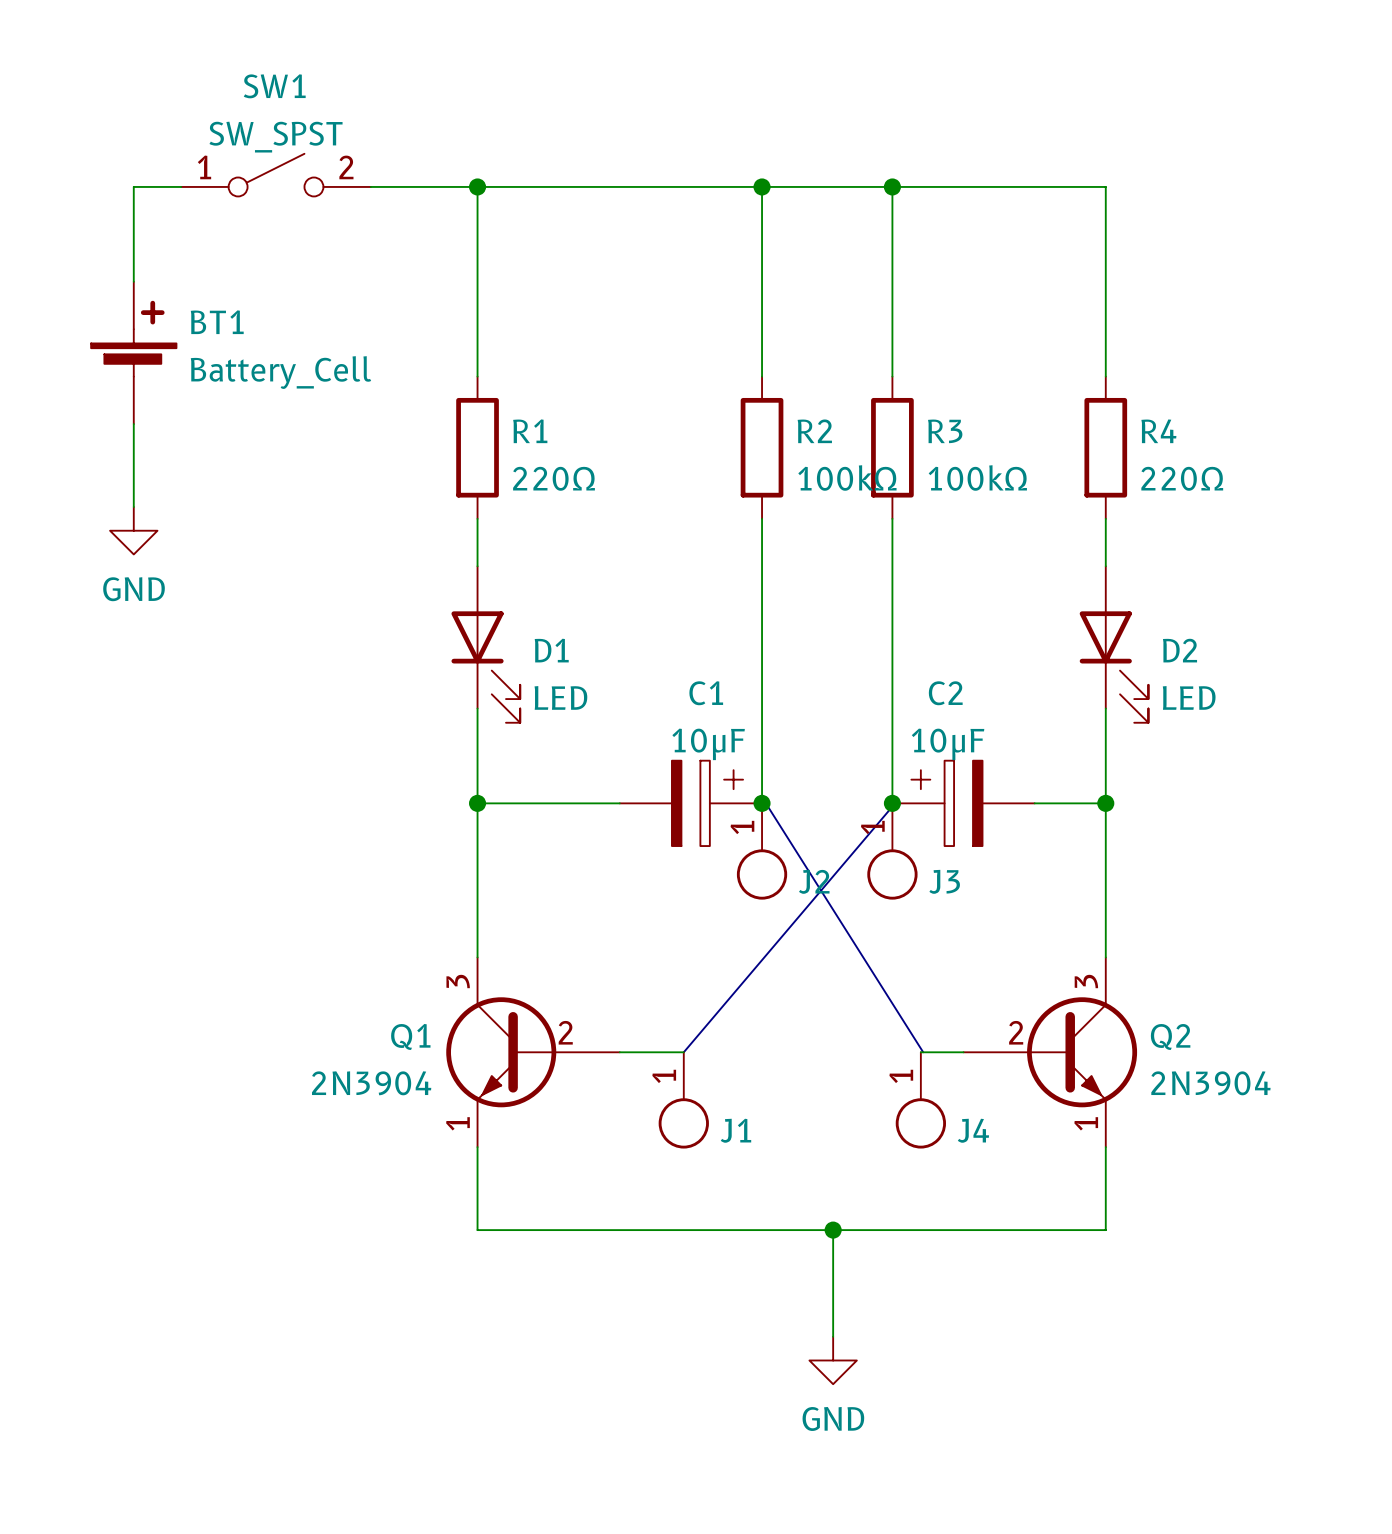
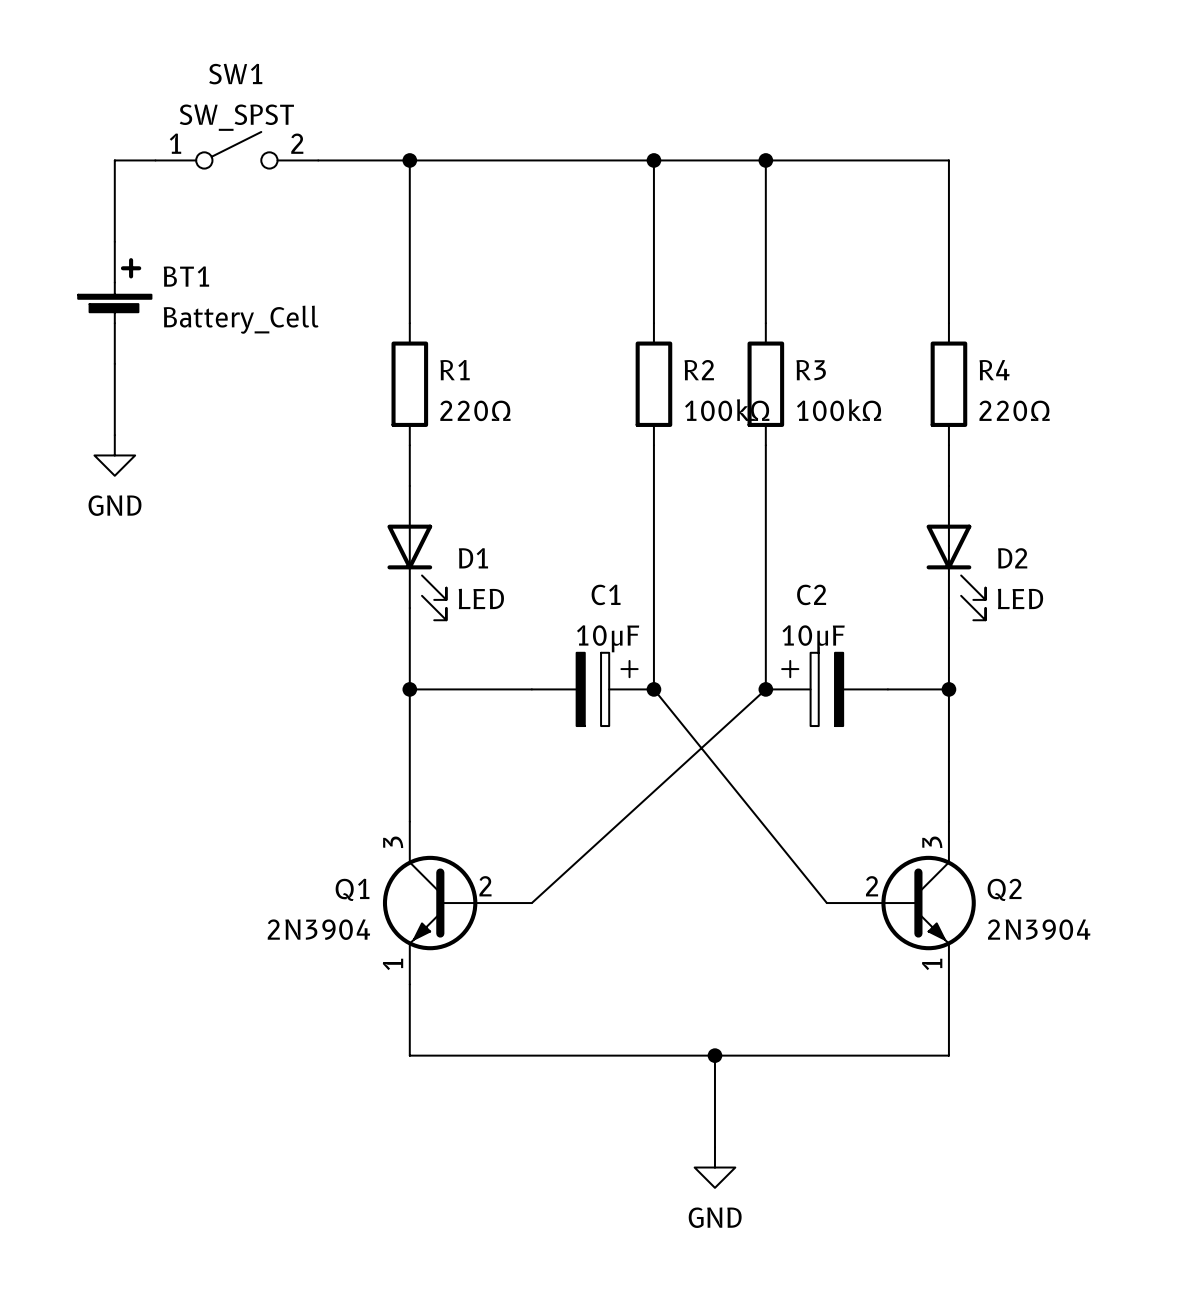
line: (764, 800) (923, 1052) -> none
line: (897, 800) (683, 1052) -> none
J2: (762, 851) -> none
J3: (892, 851) -> none
wire: (619, 1052) (683, 1052) -> (531, 903) (765, 689)
wire: (920, 1052) (963, 1052) -> (653, 689) (826, 903)
J1: (683, 1100) -> none
J4: (920, 1100) -> none

